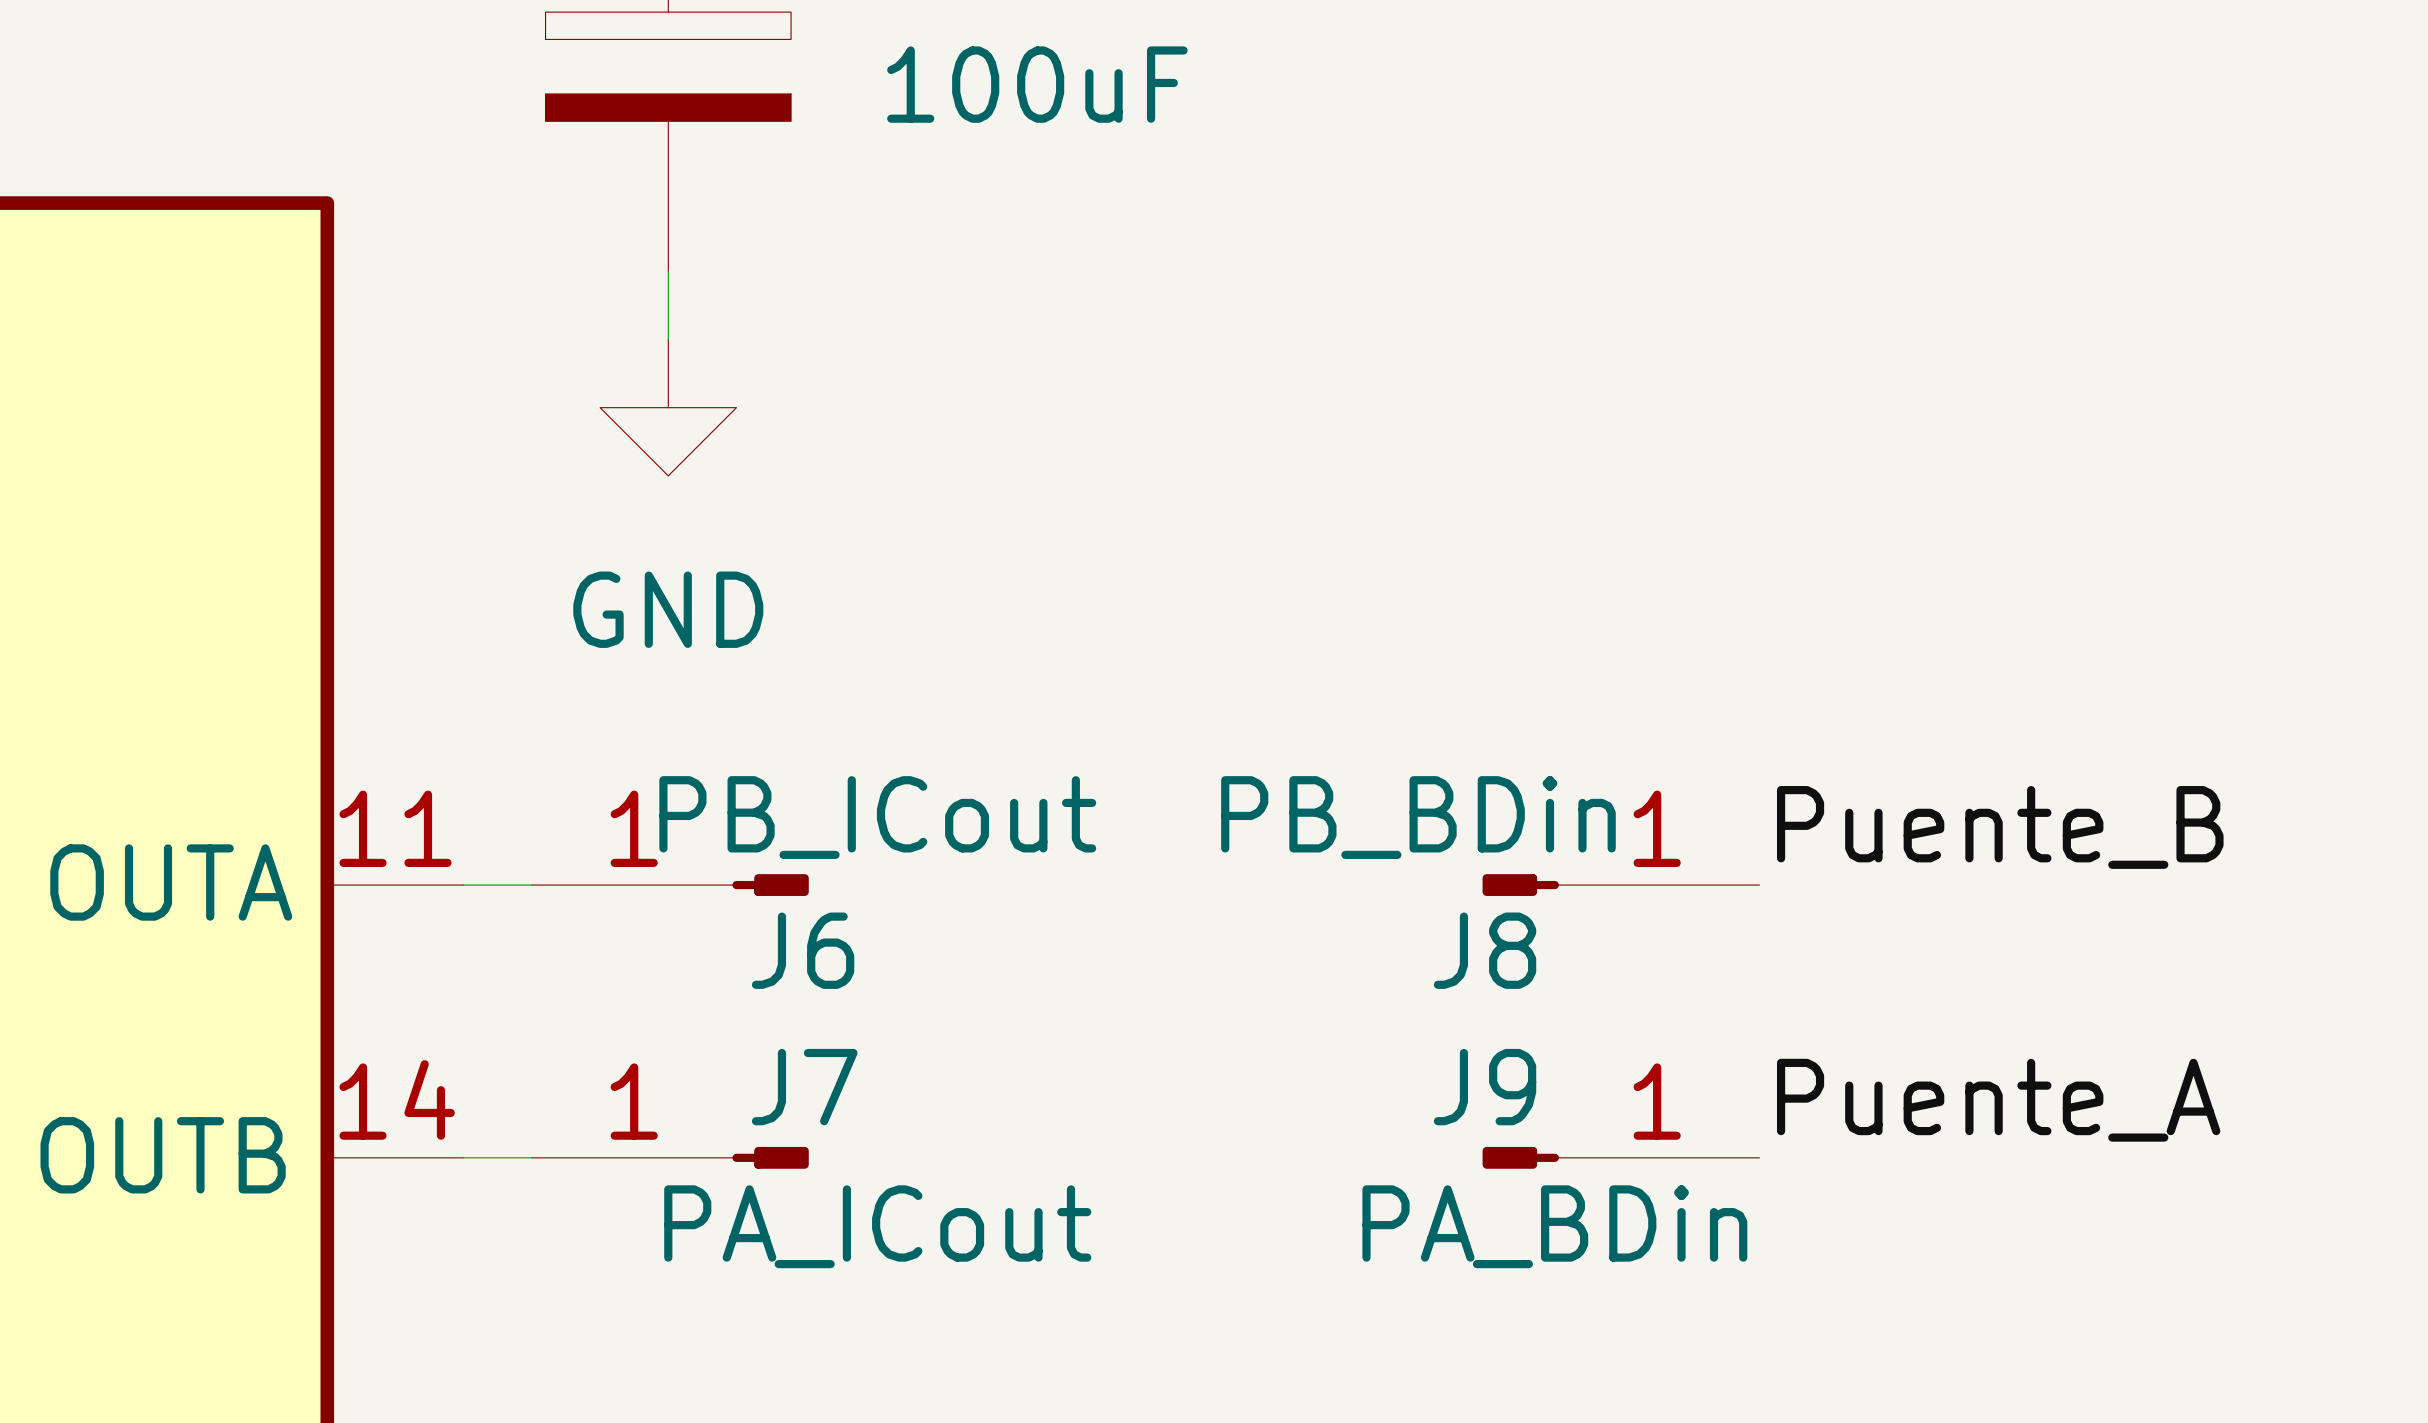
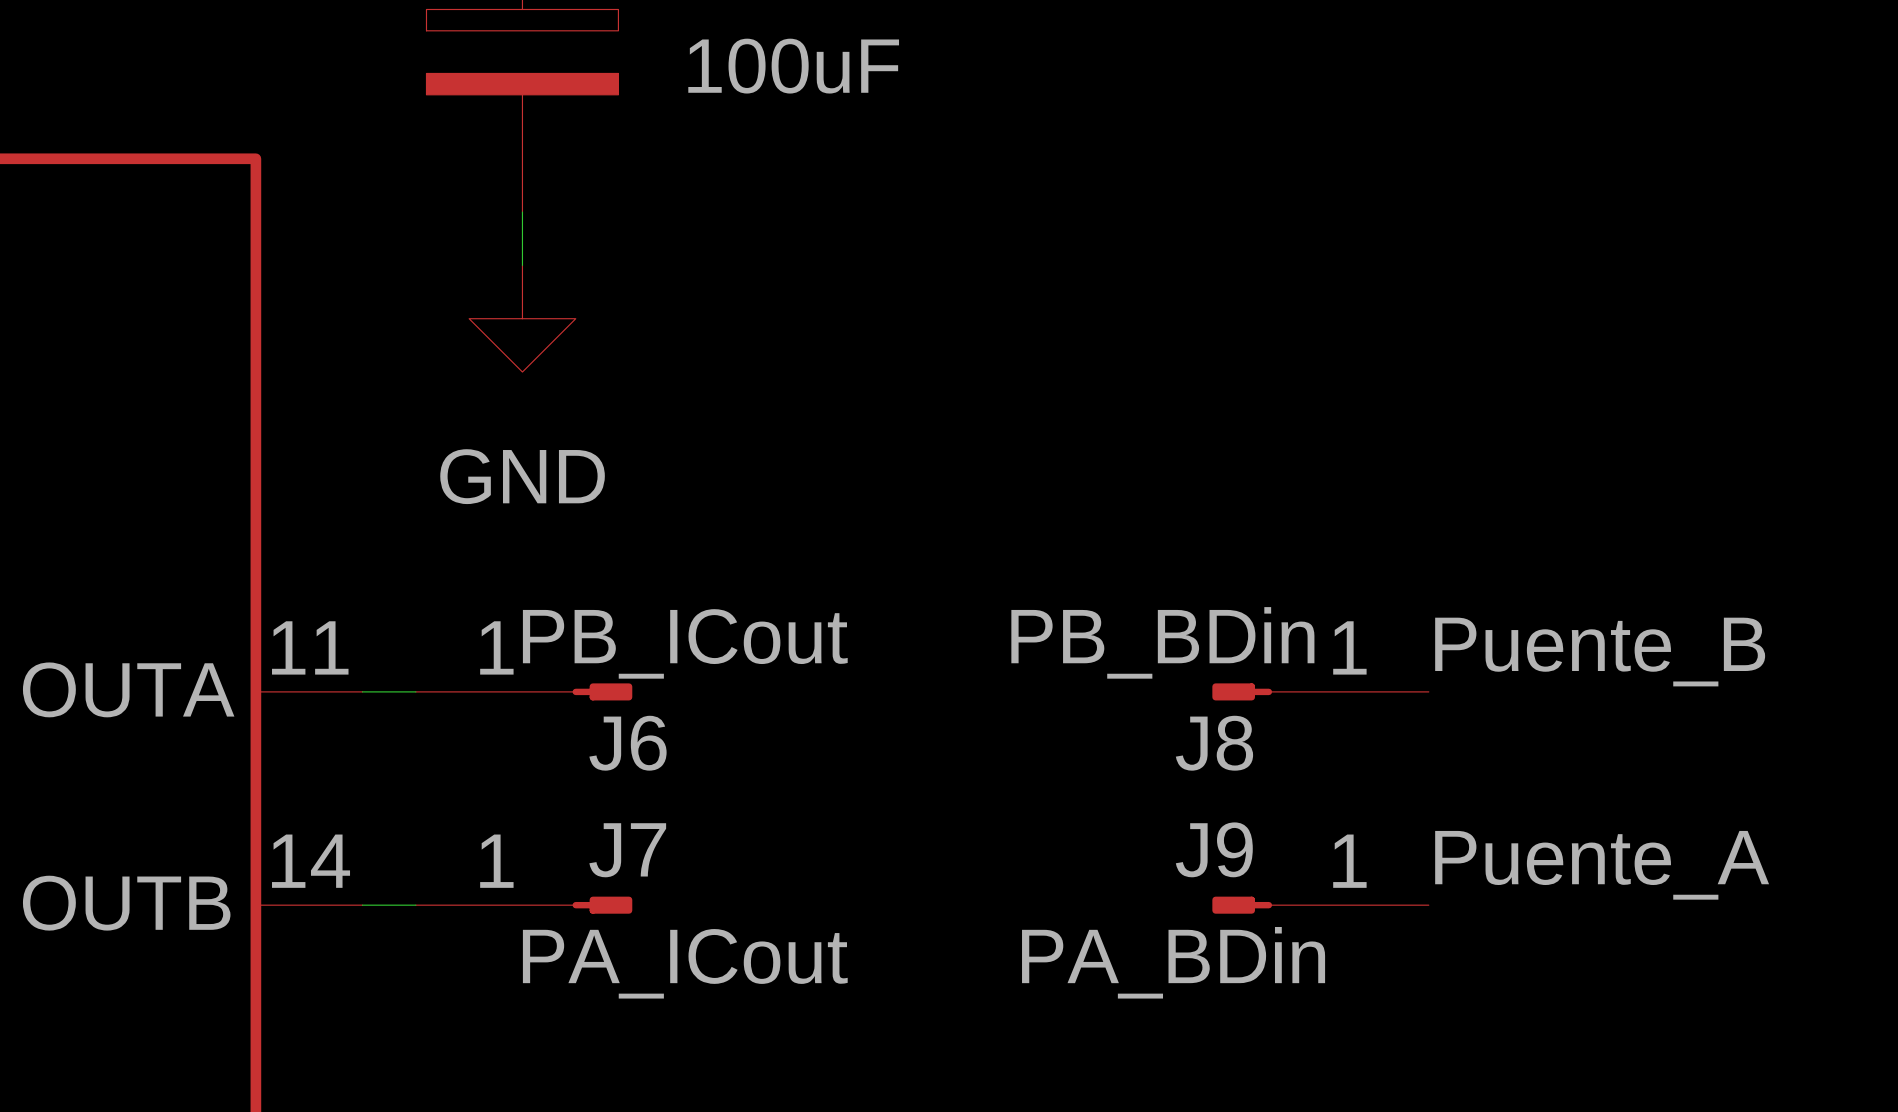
label position: Puente_B (2000, 827) -> Puente_B (1600, 652)
J8 position: (1621, 885) -> (1320, 691)
label position: Puente_A (1998, 1100) -> Puente_A (1602, 865)
J9 position: (1621, 1157) -> (1320, 905)
J9 value position: PA_BDin (1554, 1226) -> PA_BDin (1173, 962)

